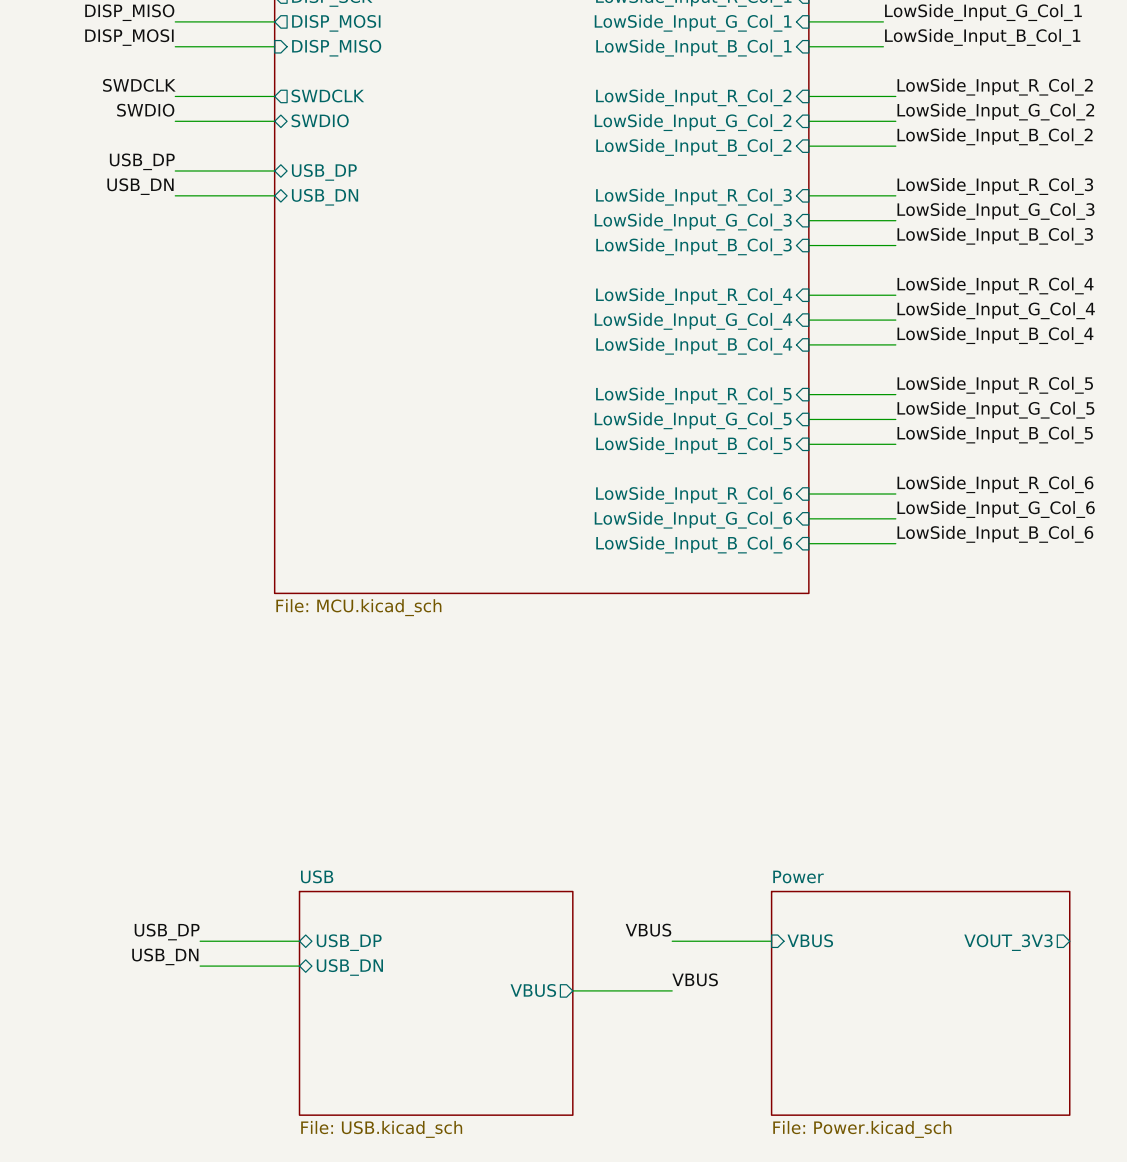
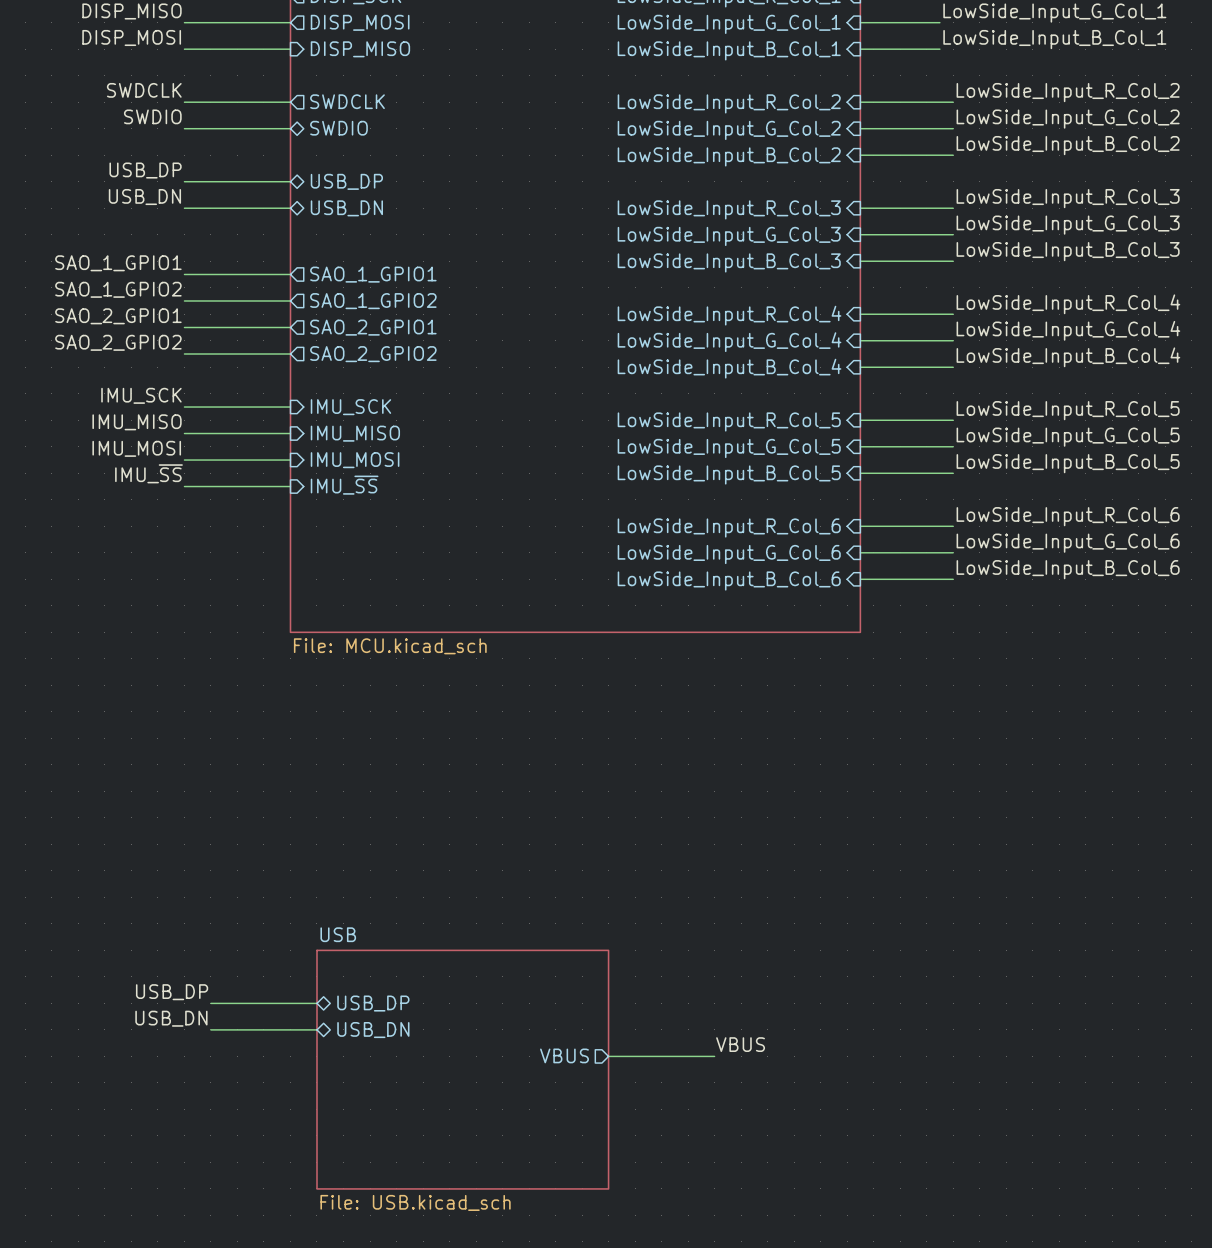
label: none -> SAO_1_GPIO1 (118, 263)
wire: none -> (184, 274) (290, 274)
sheet pin: none -> SAO_1_GPIO1 (373, 274)
label: none -> SAO_1_GPIO2 (118, 289)
wire: none -> (184, 300) (290, 300)
sheet pin: none -> SAO_1_GPIO2 (373, 301)
label: none -> SAO_2_GPIO1 (118, 316)
wire: none -> (184, 327) (290, 327)
sheet pin: none -> SAO_2_GPIO1 (373, 327)
label: none -> SAO_2_GPIO2 (118, 342)
wire: none -> (184, 354) (290, 354)
sheet pin: none -> SAO_2_GPIO2 (373, 354)
label: none -> IMU_SCK (141, 395)
wire: none -> (184, 407) (290, 407)
sheet pin: none -> IMU_SCK (350, 407)
label: none -> IMU_MISO (137, 422)
wire: none -> (184, 433) (290, 433)
sheet pin: none -> IMU_MISO (355, 433)
label: none -> IMU_MOSI (136, 448)
wire: none -> (184, 460) (290, 460)
sheet pin: none -> IMU_MOSI (355, 460)
label: none -> IMU_~{SS} (148, 473)
wire: none -> (184, 486) (290, 486)
sheet pin: none -> IMU_~{SS} (344, 485)
label: VBUS (648, 930) -> none
sheet pin: VBUS (810, 940) -> none
wire: (672, 941) (771, 941) -> none
sheet pin: VOUT_3V3 (1008, 942) -> none
sheet Power: File: Power.kicad_sch (920, 1003) -> none

